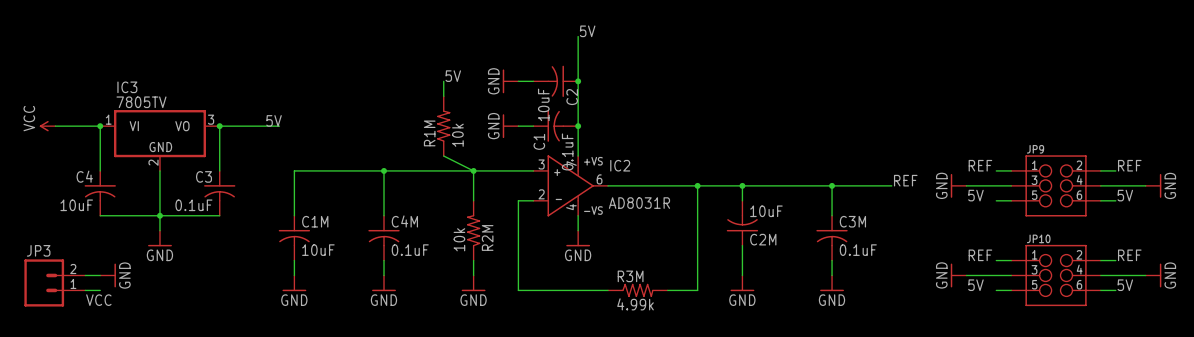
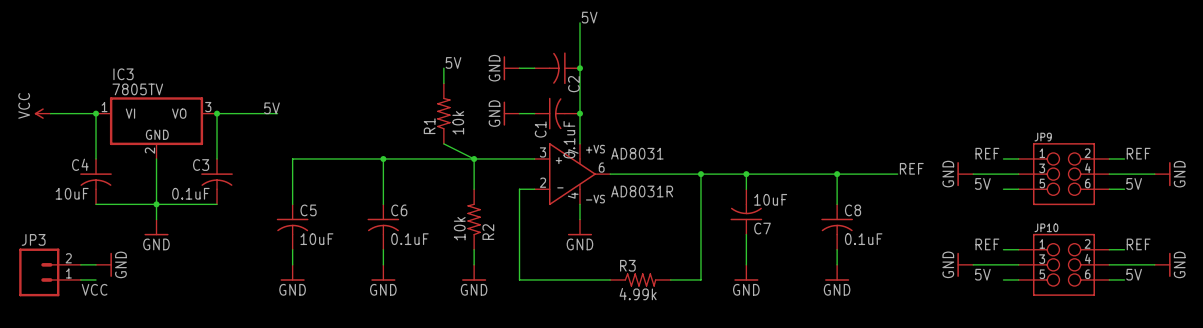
C2 value: 10uF (543, 104) -> none
R1M name: R1M (429, 133) -> R1 (429, 126)
IC2 name: IC2 (620, 165) -> AD8031 (637, 153)
C1M name: C1M (315, 221) -> C5 (308, 210)
C4M name: C4M (404, 221) -> C6 (399, 210)
C3M name: C3M (852, 221) -> C8 (853, 210)
R2M name: R2M (487, 237) -> R2 (488, 232)
C2M name: C2M (763, 239) -> C7 (762, 228)
R3M name: R3M (630, 276) -> R3 (627, 265)

